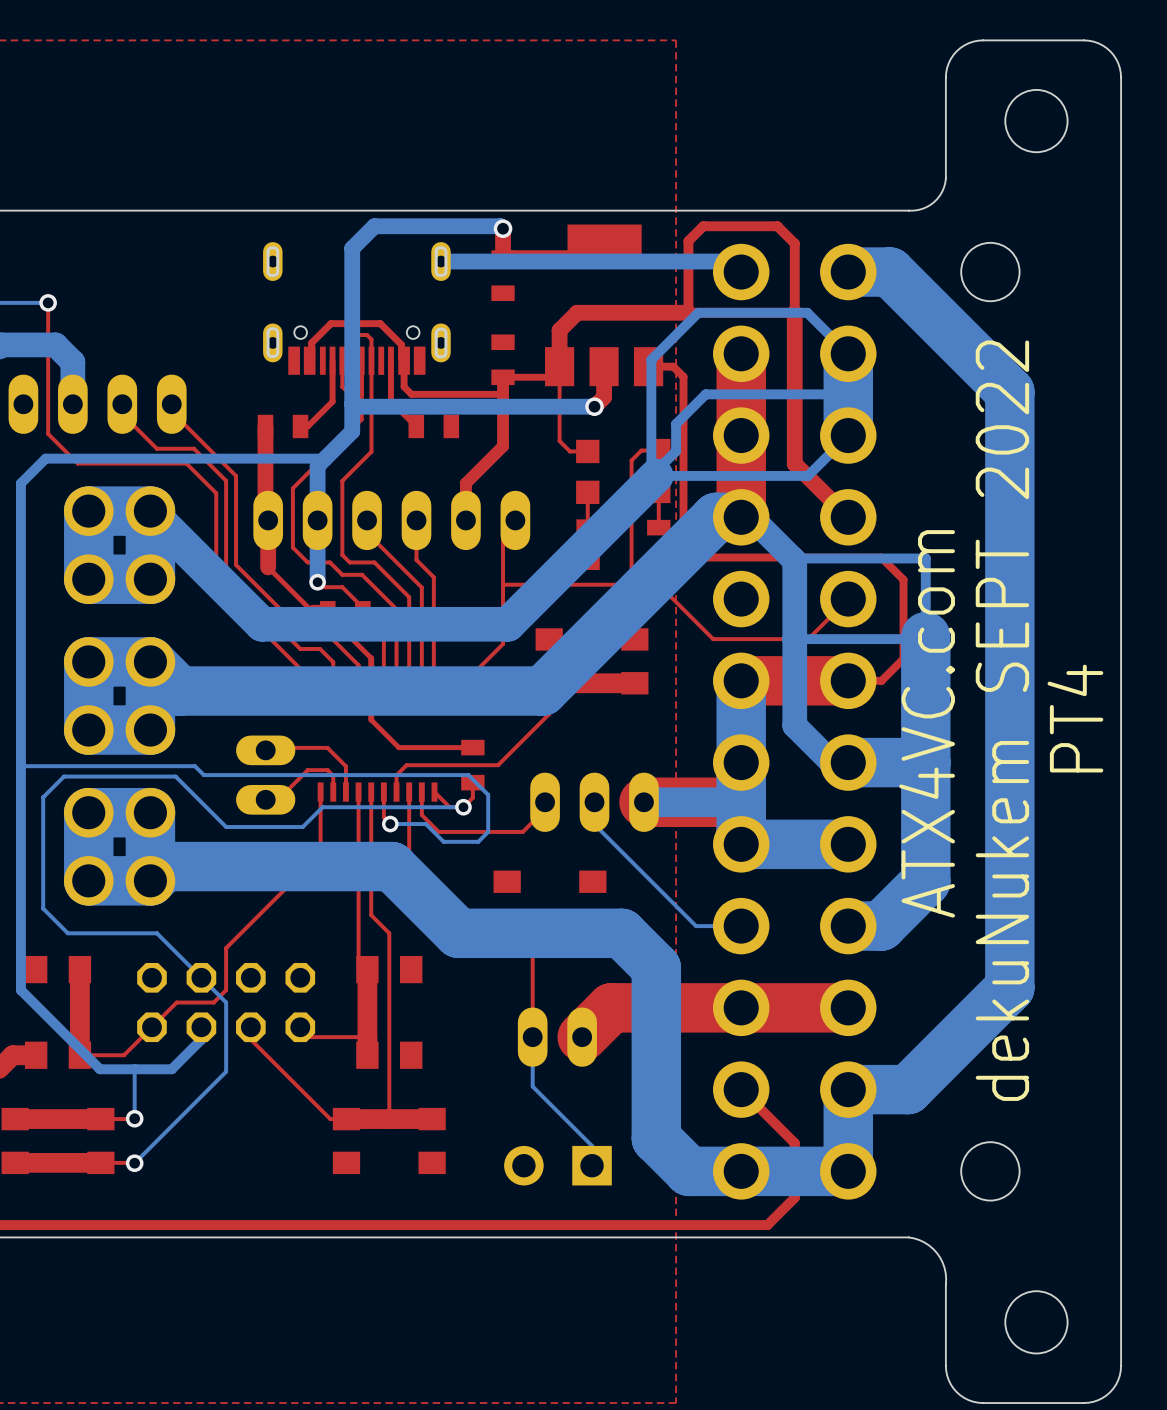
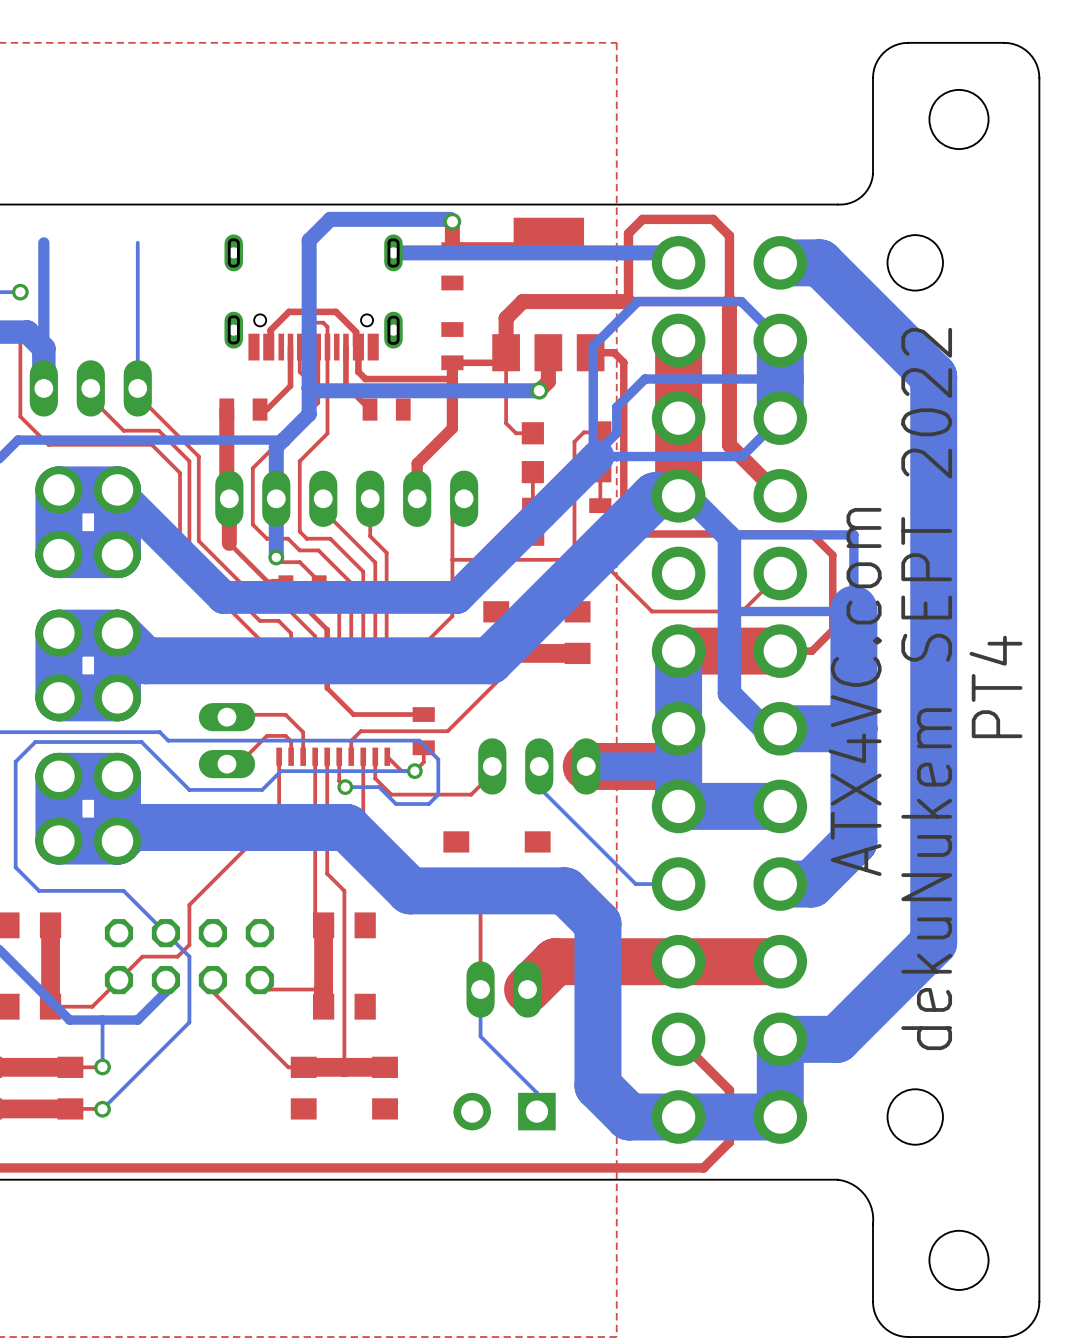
bottom track: none -> (43, 242) (43, 348)
bottom track: none -> (137, 242) (137, 376)
top track: (48, 302) (48, 349) -> none

